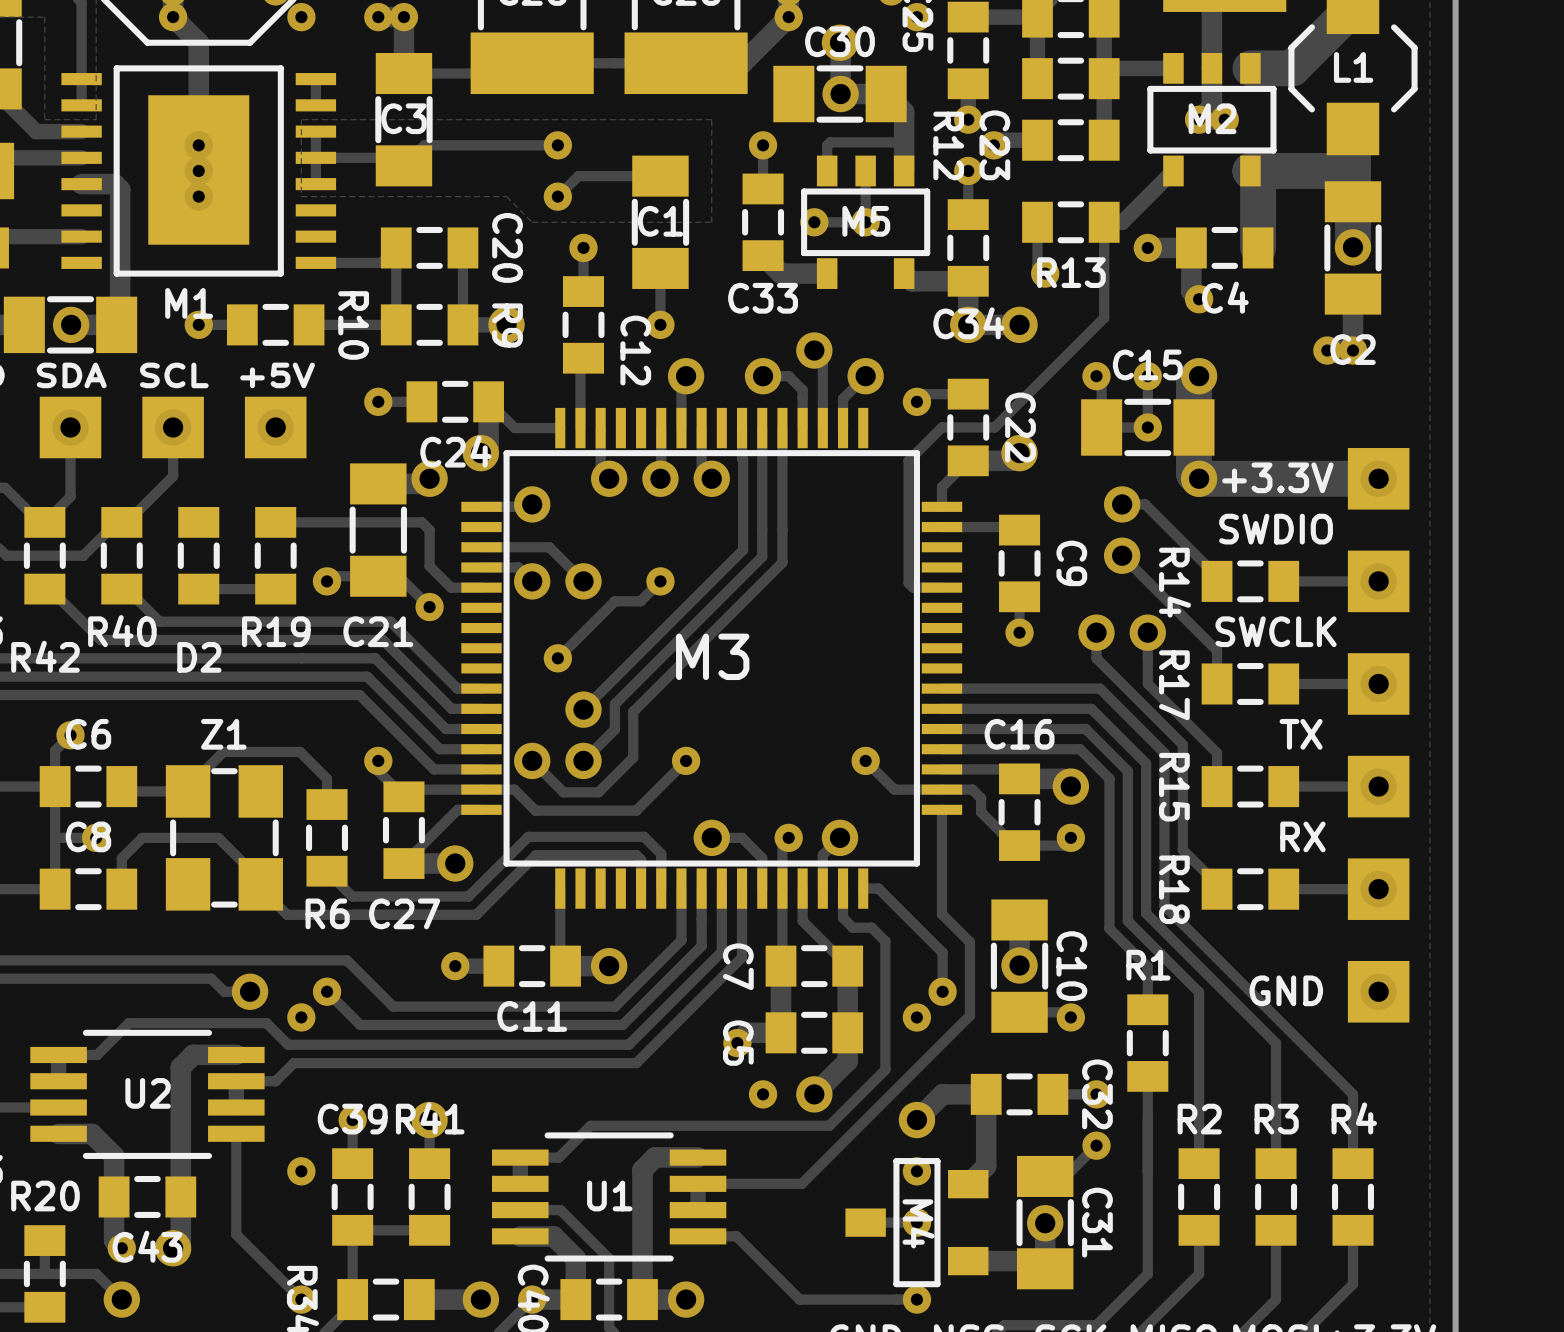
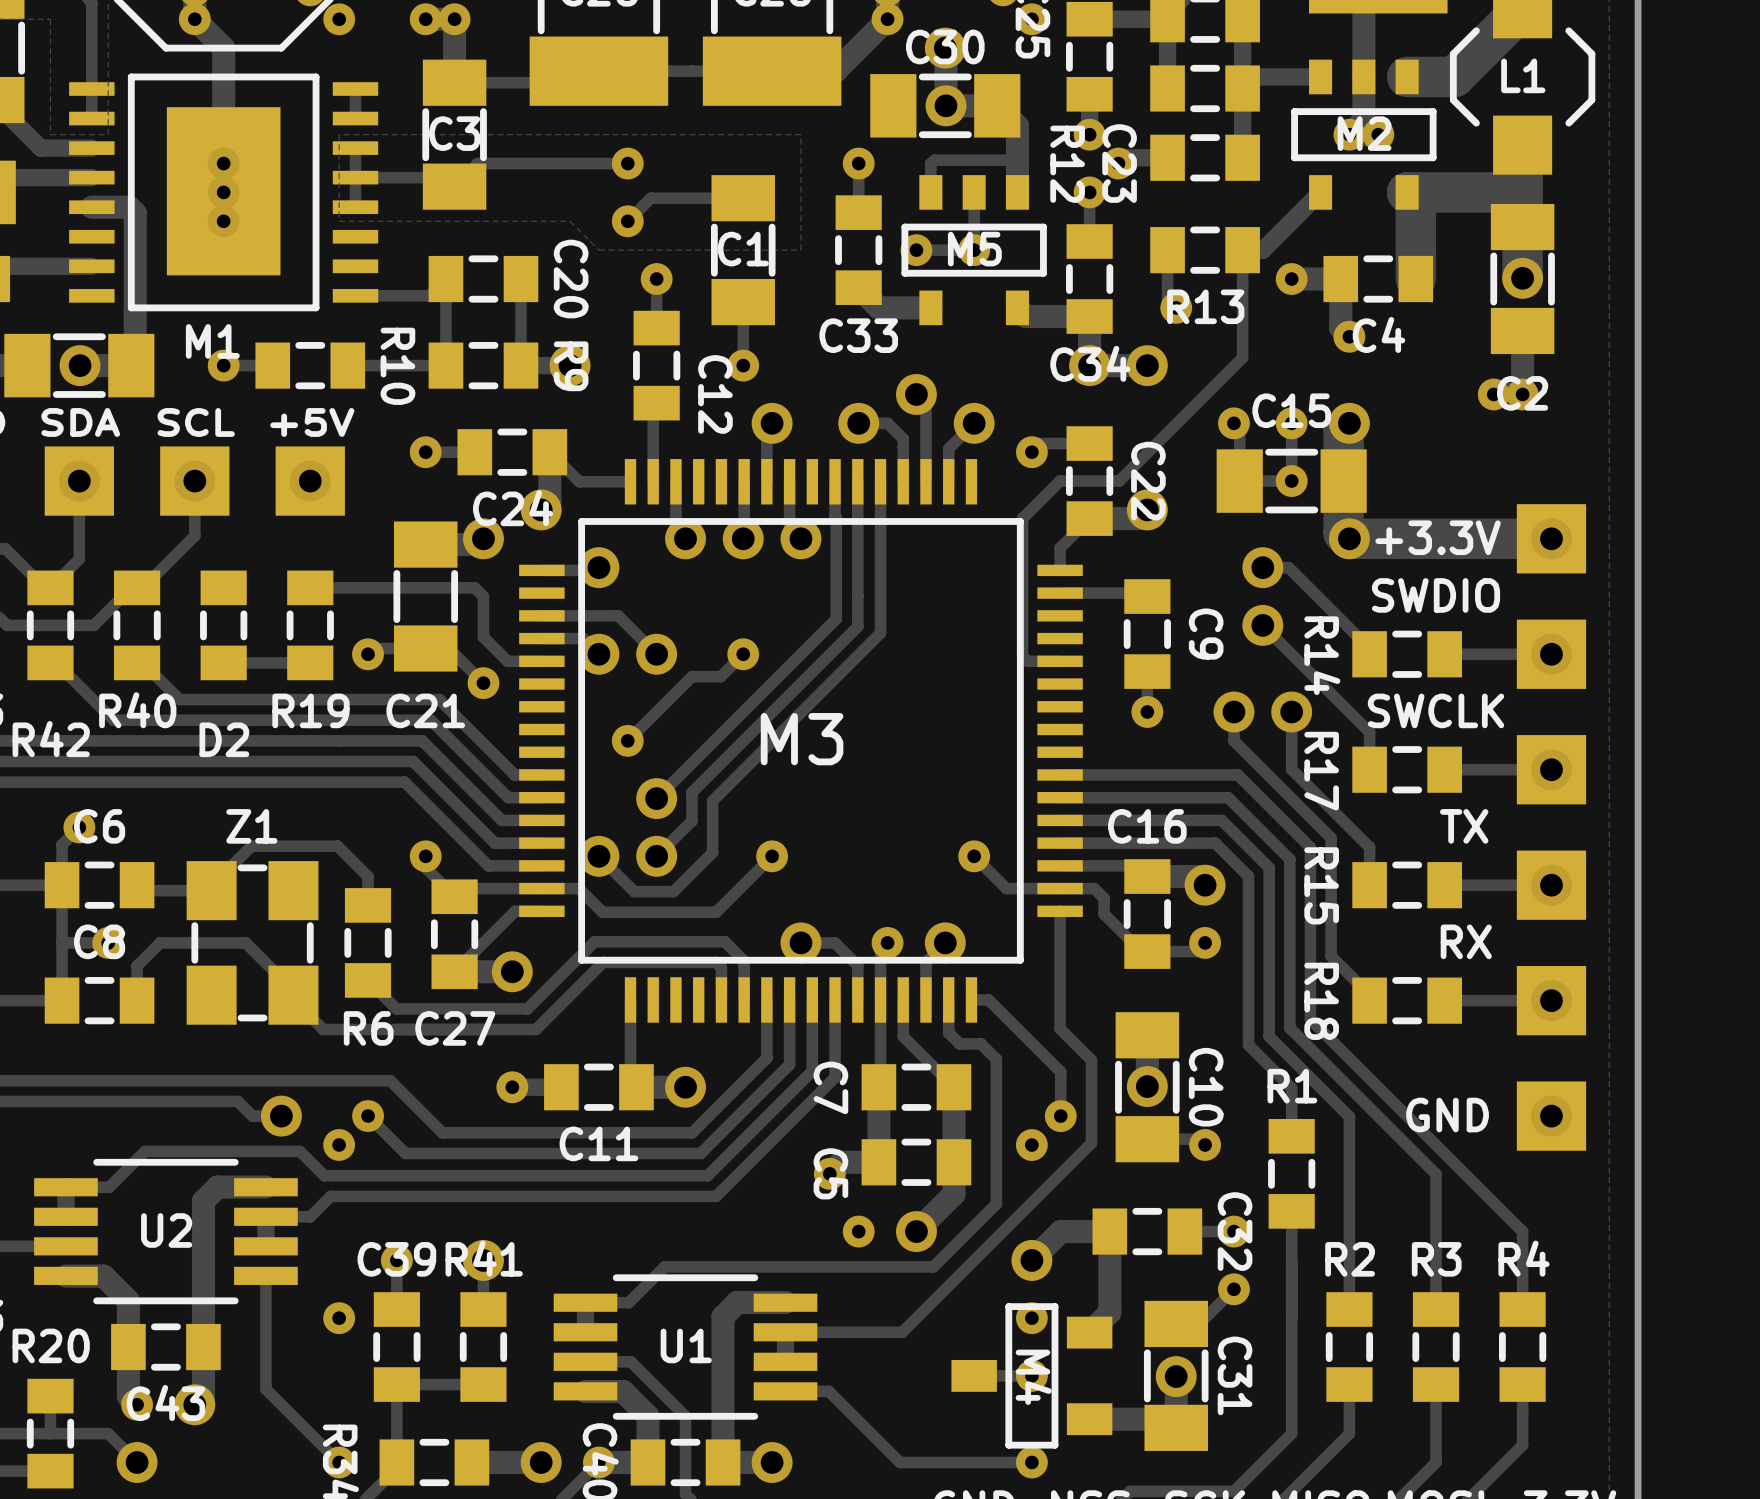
M2 footprint: [1147, 53, 1277, 187] -> [1291, 59, 1437, 210]
M5 footprint: [801, 155, 931, 289] -> [901, 175, 1047, 326]
M3 footprint: [461, 407, 963, 909] -> [519, 459, 1083, 1023]

